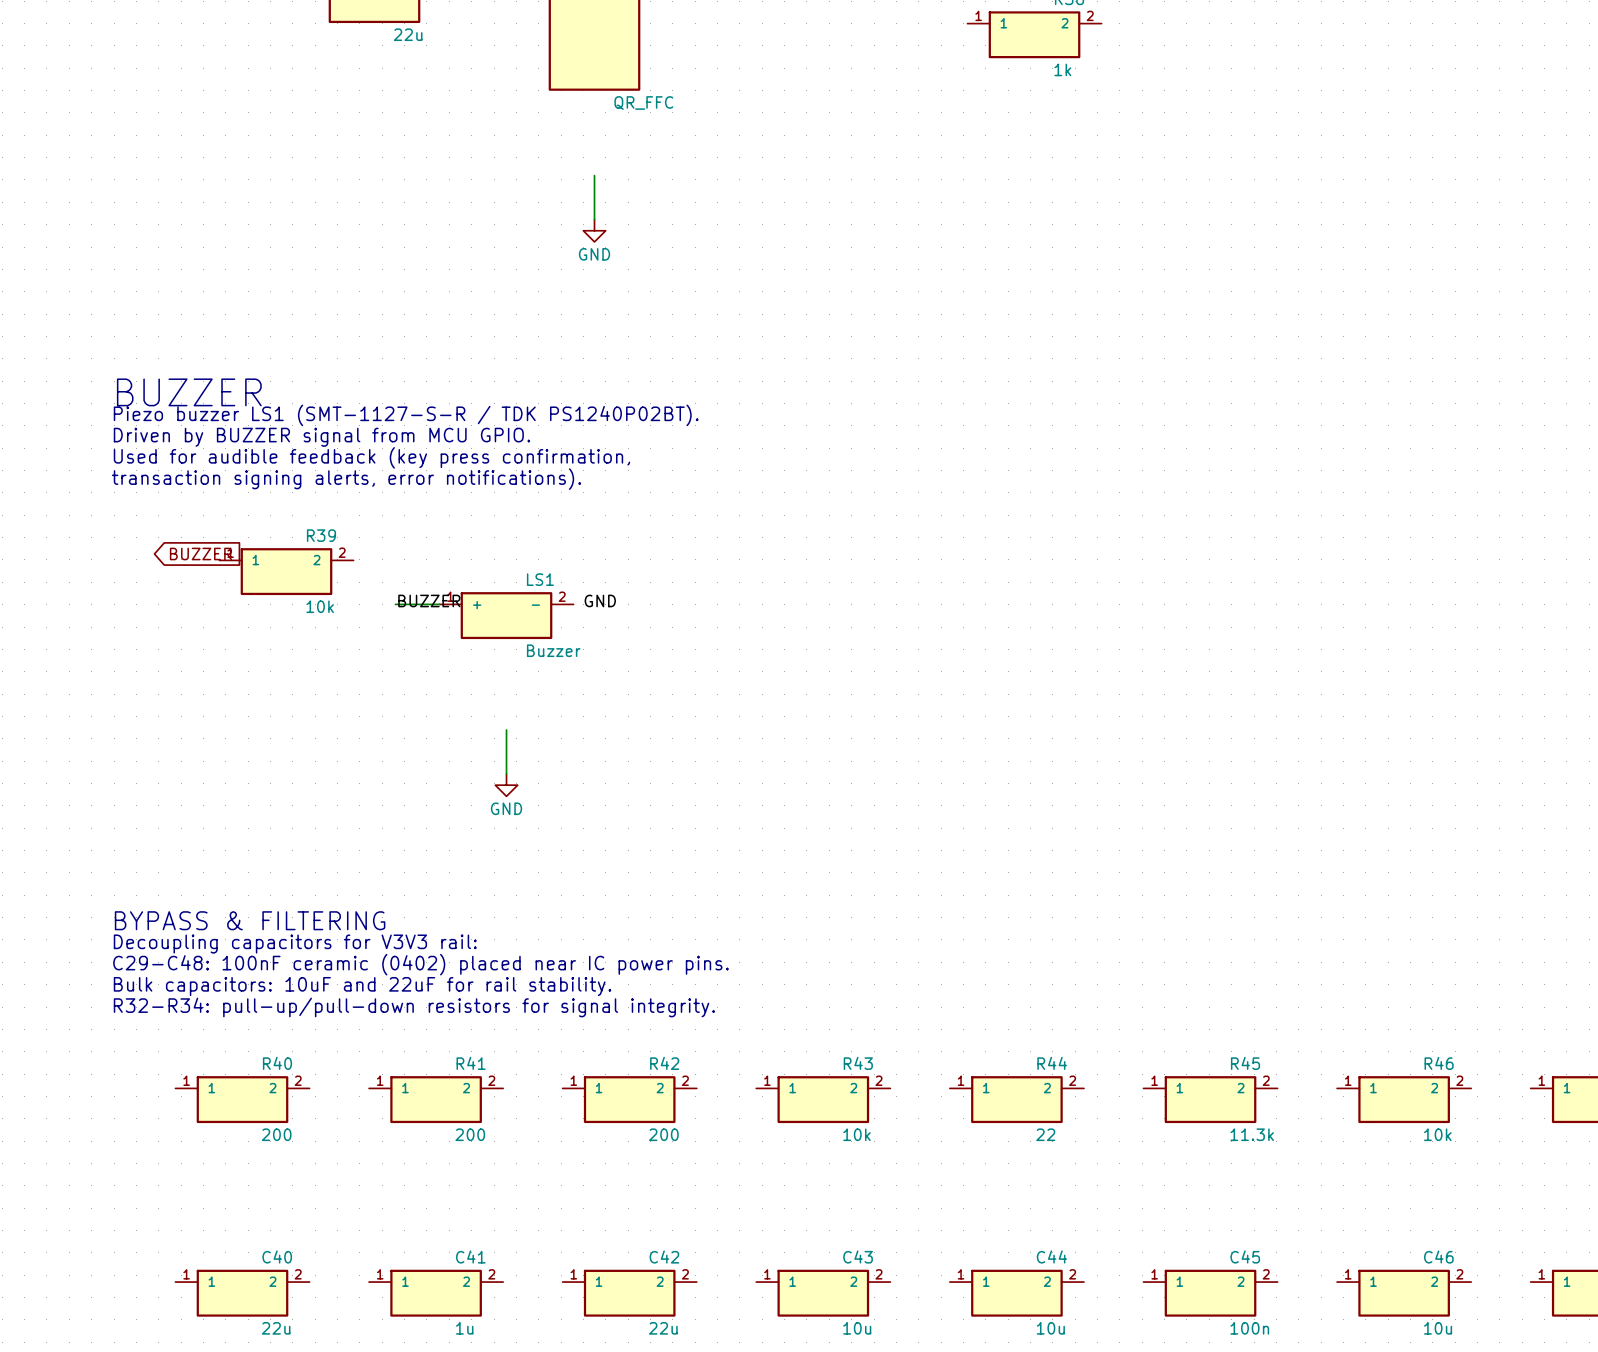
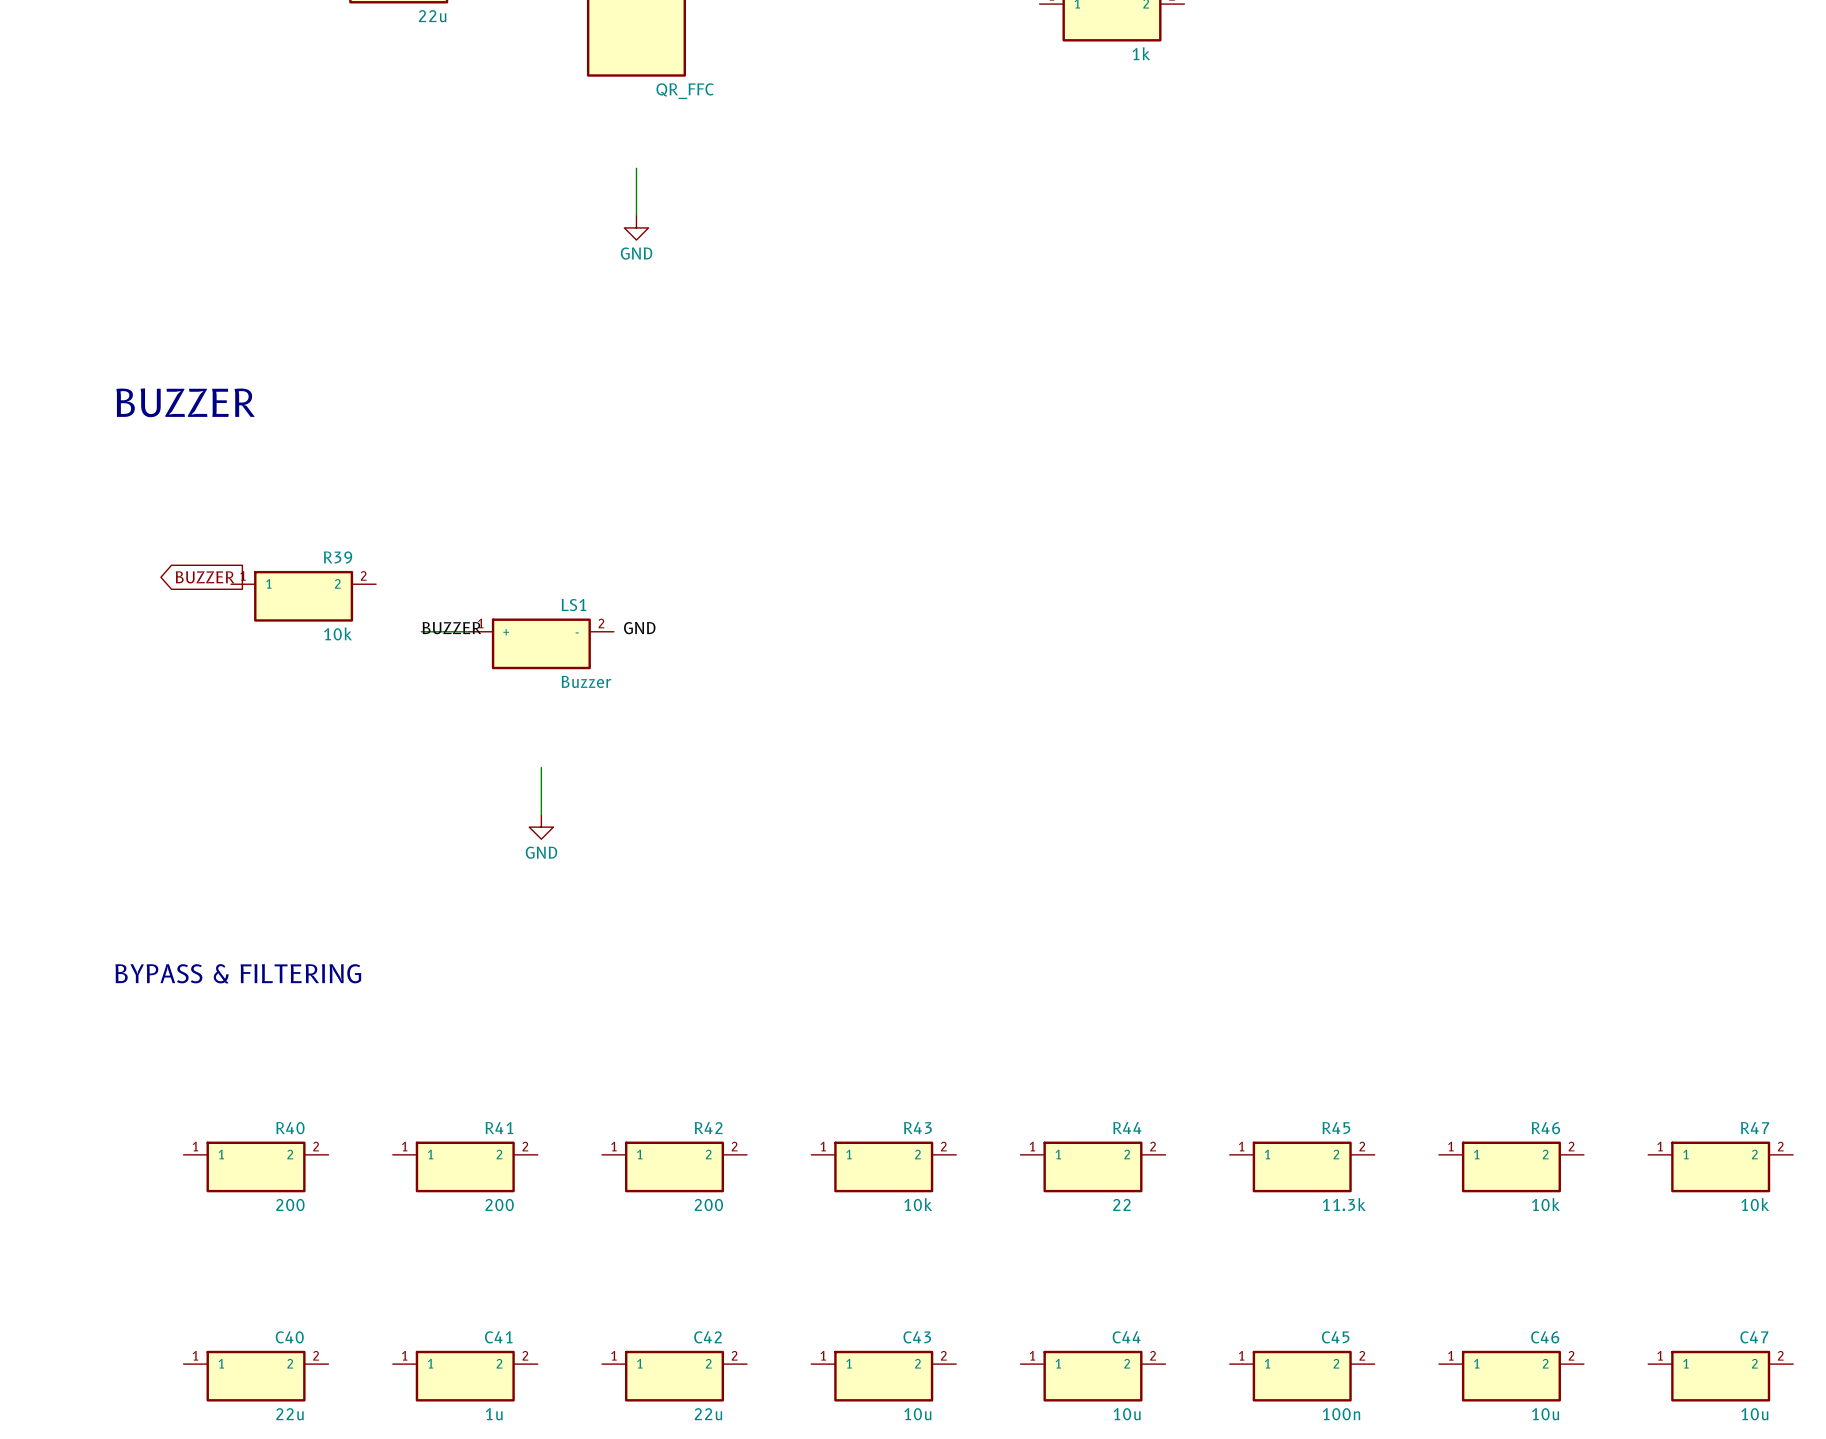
text: Piezo buzzer LS1 (SMT-1127-S-R / TDK PS1240P02BT). (406, 415) -> none
text: Driven by BUZZER signal from MCU GPIO. (321, 437) -> none
text: Used for audible feedback (key press confirmation, (371, 457) -> none
text: transaction signing alerts, error notifications). (346, 479) -> none
text: Decoupling capacitors for V3V3 rail: (295, 944) -> none
text: C29-C48: 100nF ceramic (0402) placed near IC power pins. (420, 964) -> none
text: Bulk capacitors: 10uF and 22uF for rail stability. (362, 986) -> none
text: R32-R34: pull-up/pull-down resistors for signal integrity. (414, 1007) -> none

